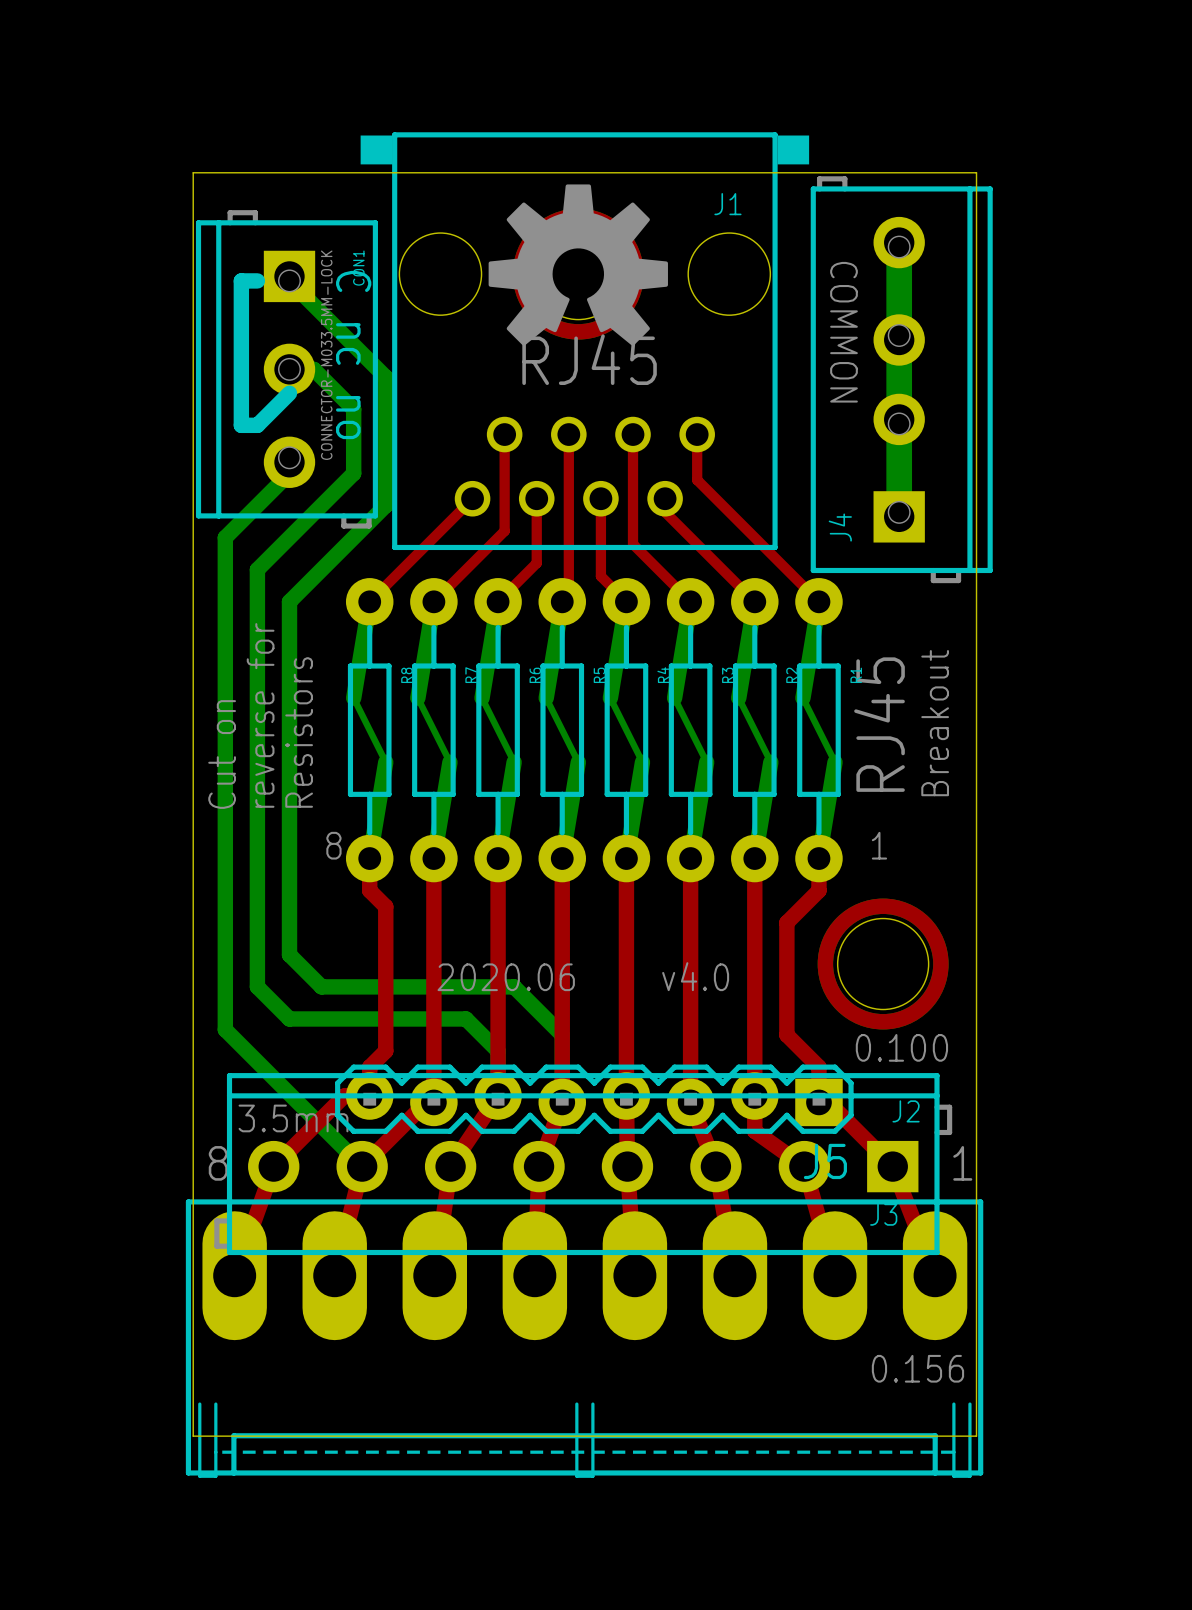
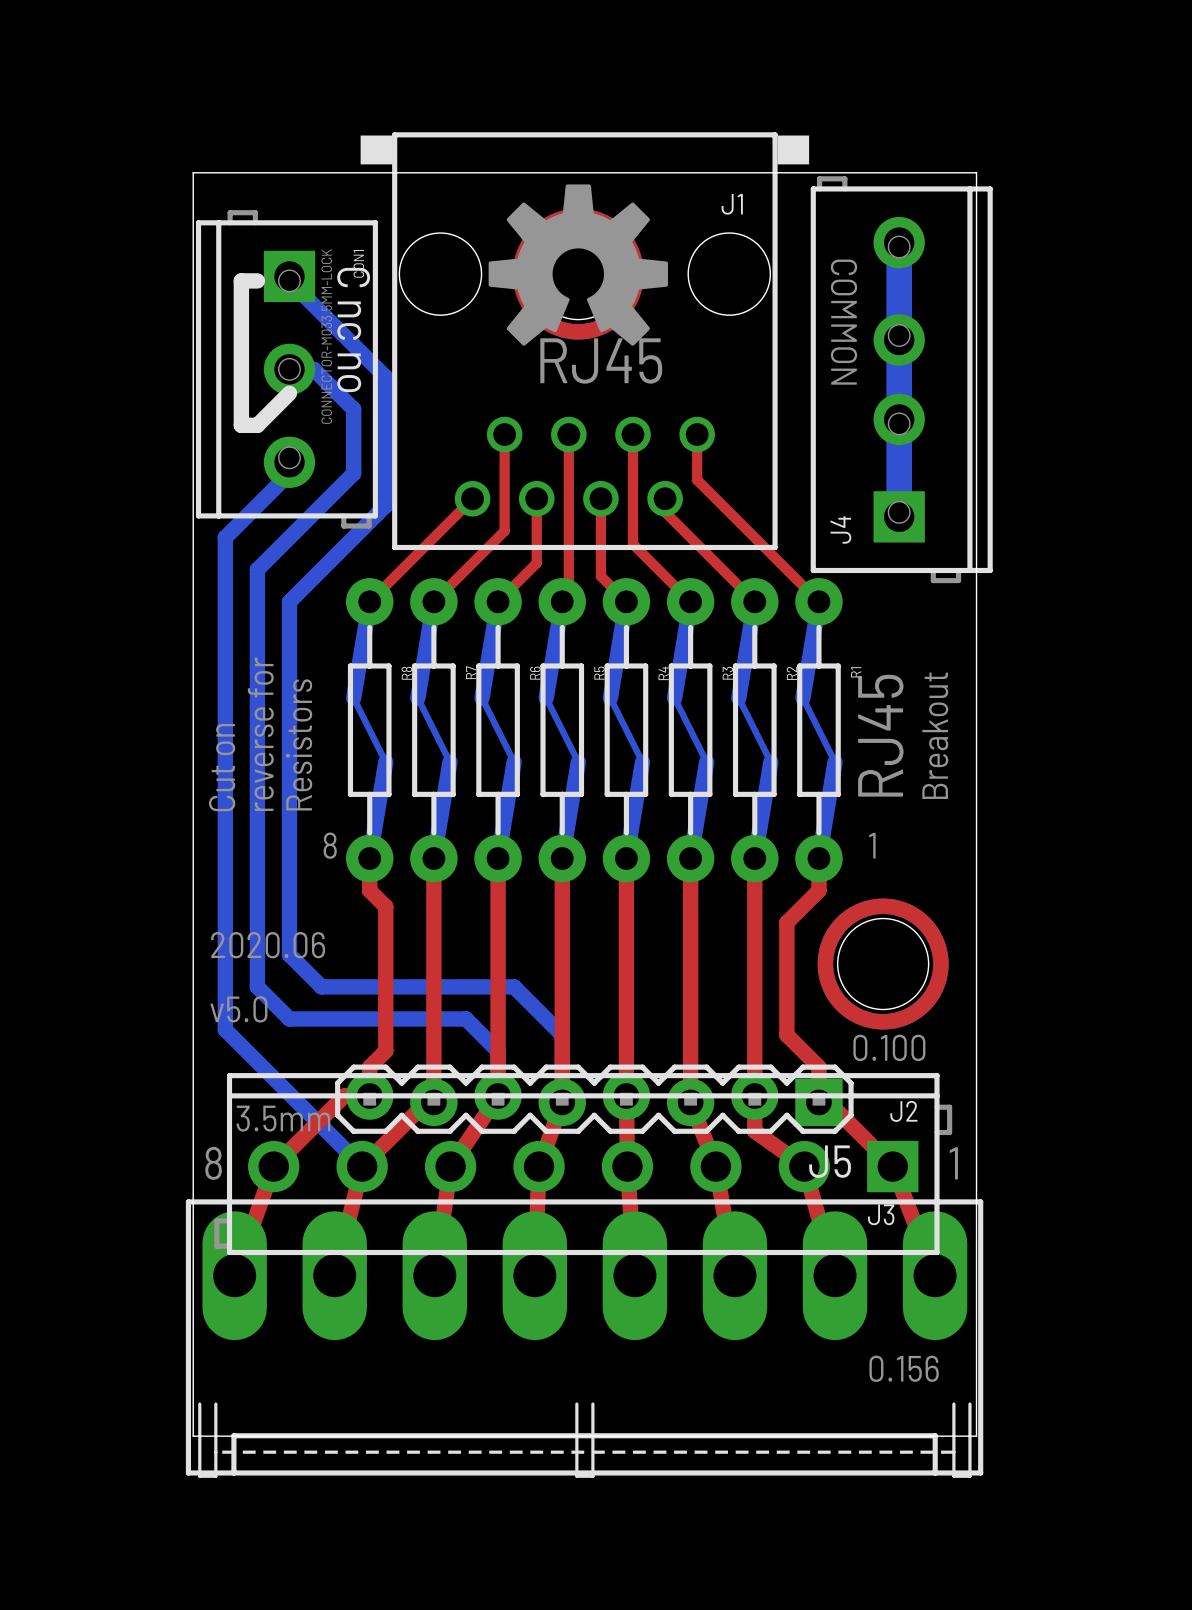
text: v4.0 (695, 976) -> none
text position: 2020.06 (506, 977) -> 2020.06 (268, 945)
text: none -> v5.0 (238, 1009)

